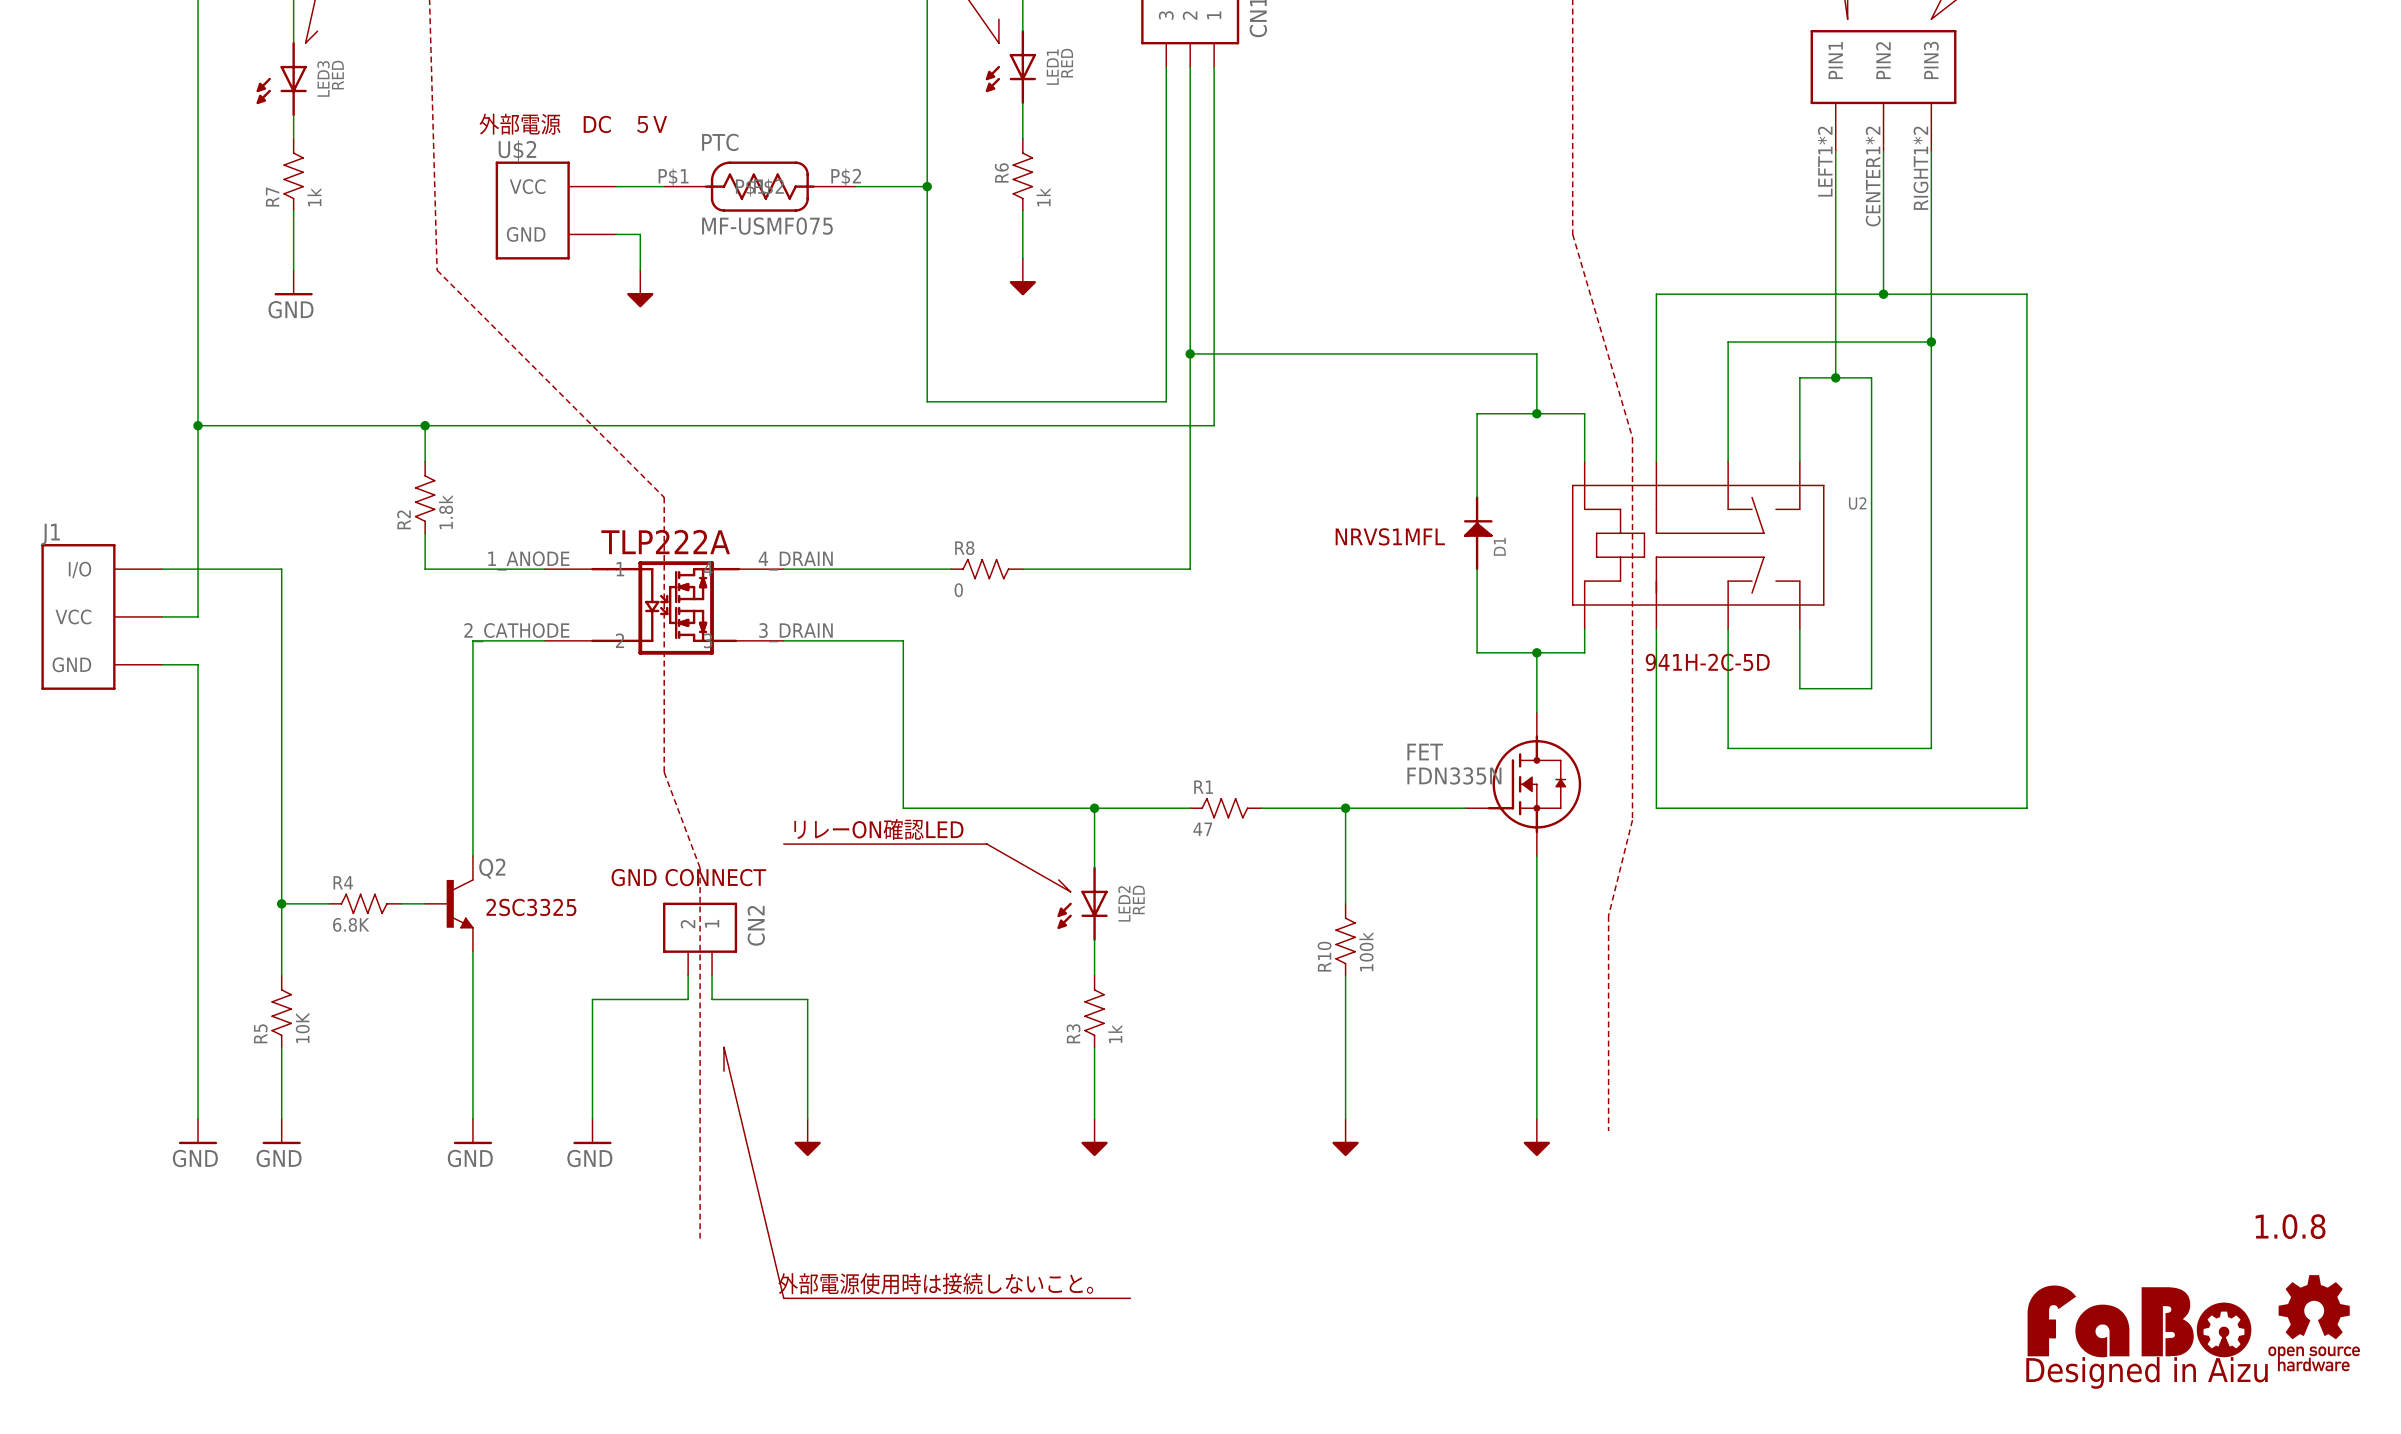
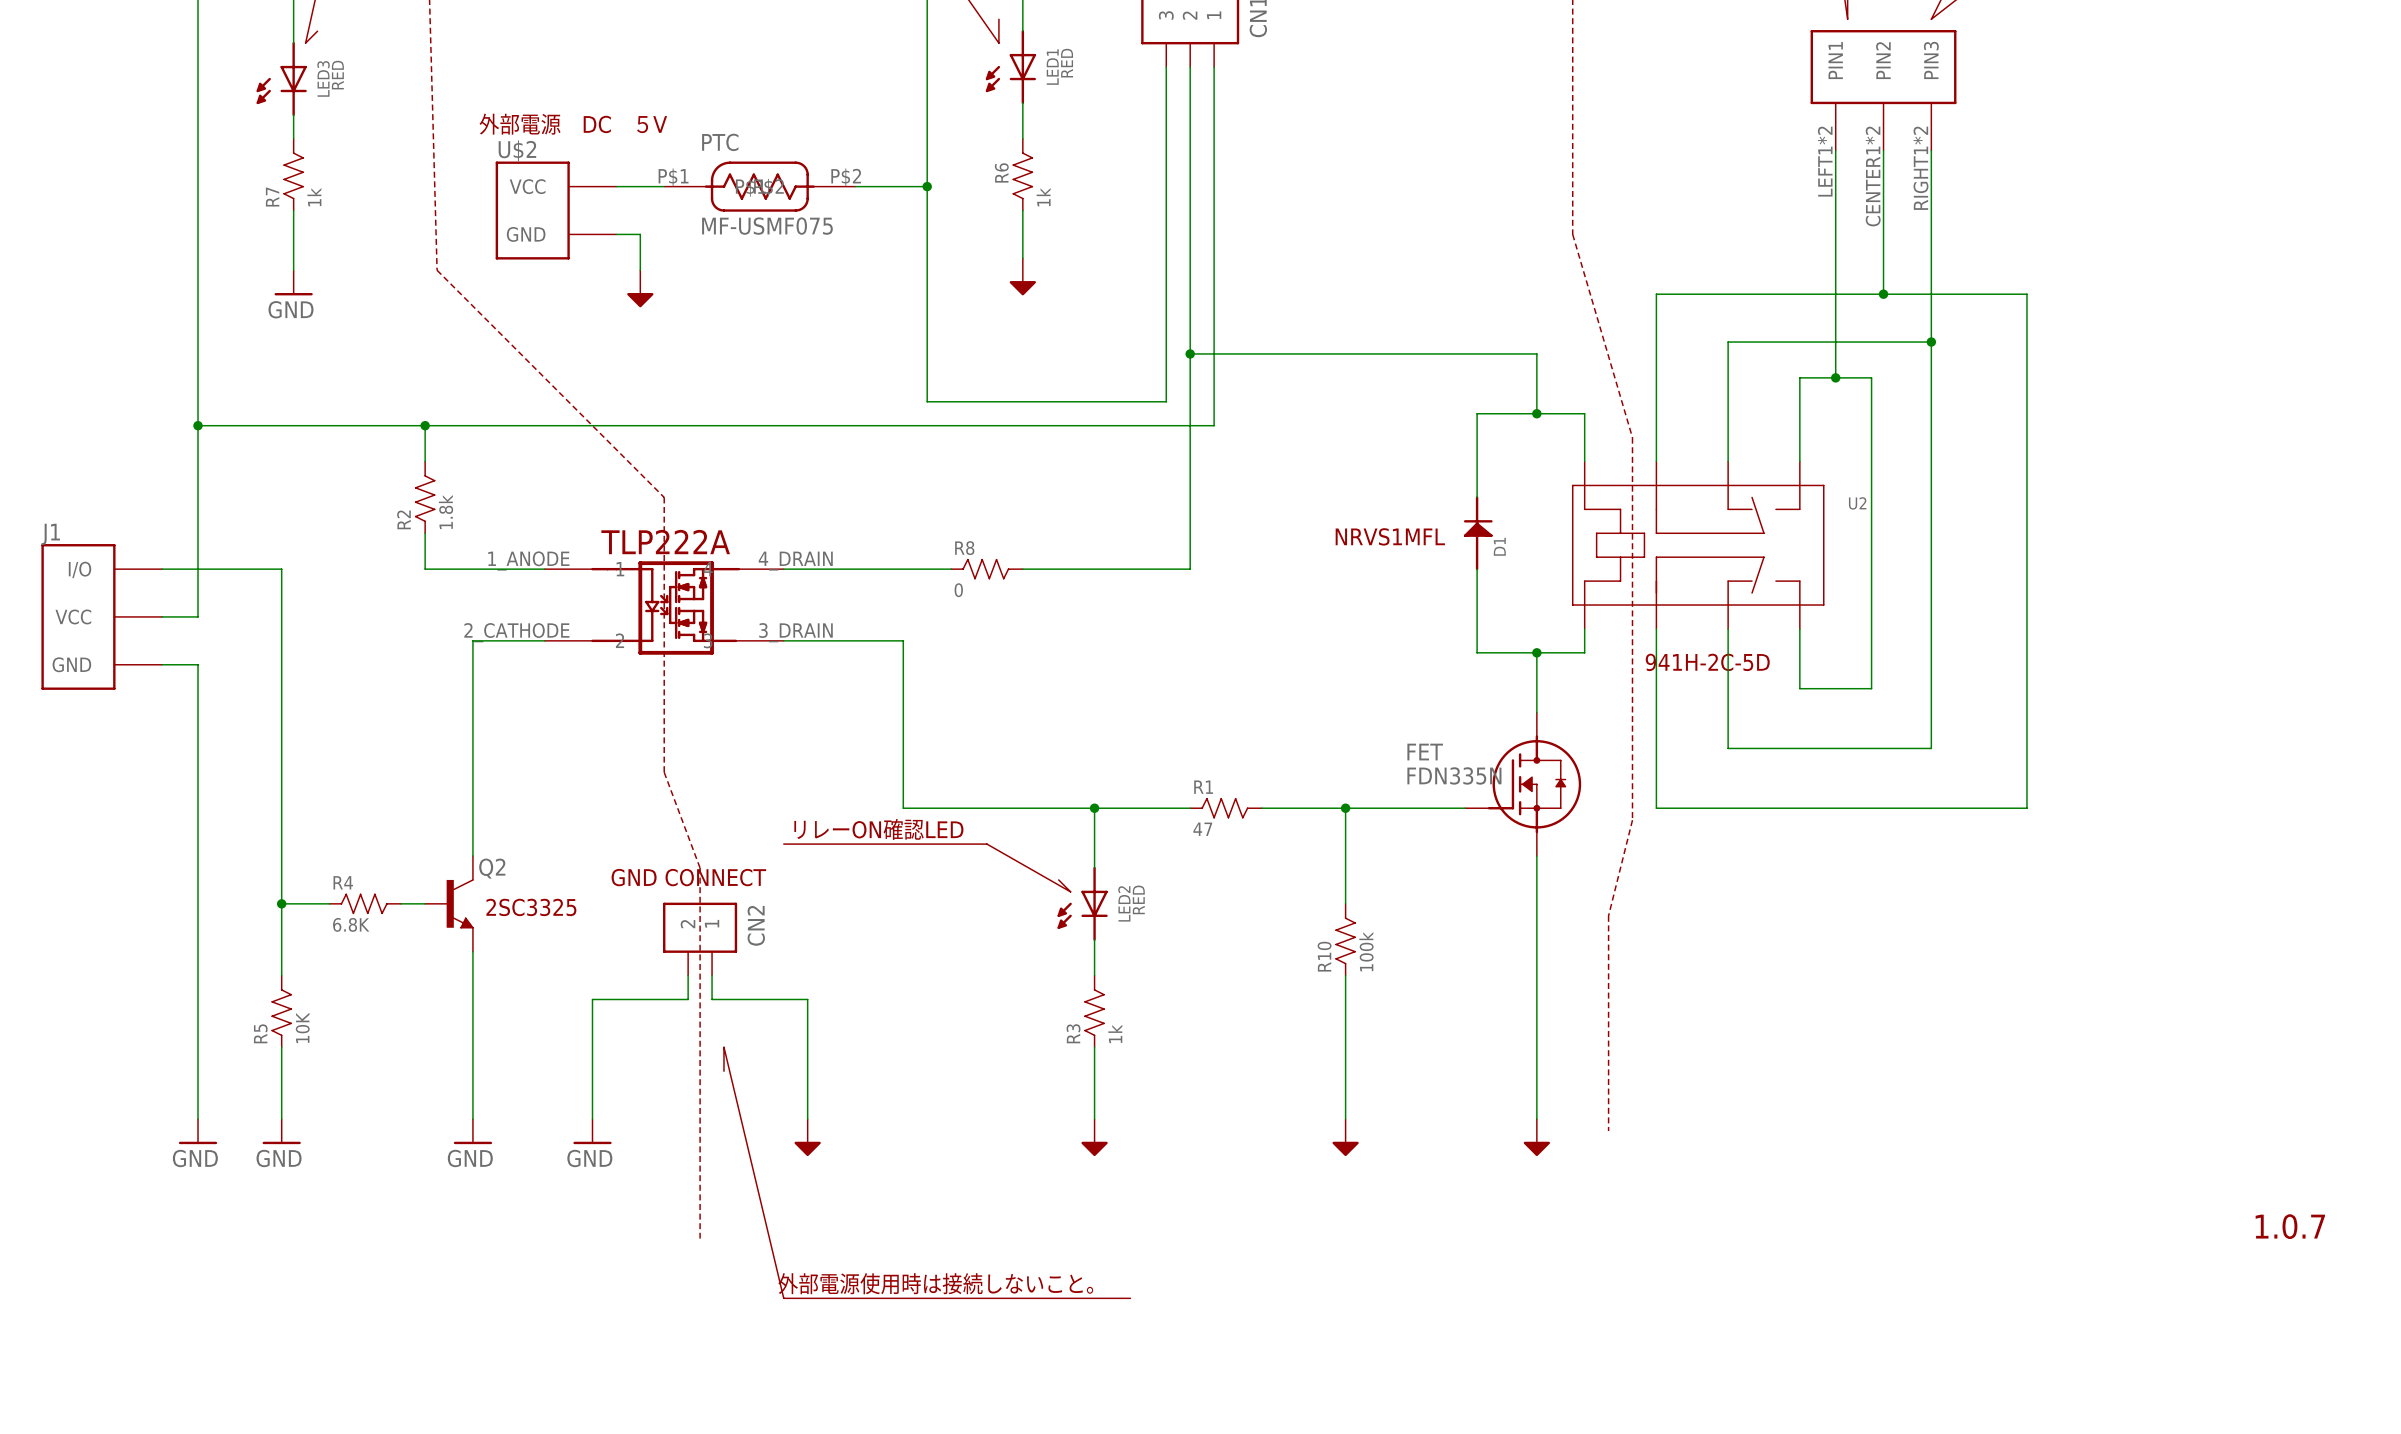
text: 1.0.8 (2290, 1226) -> 1.0.7 (2290, 1226)
part: (2139, 1321) -> none
part: (2314, 1323) -> none

